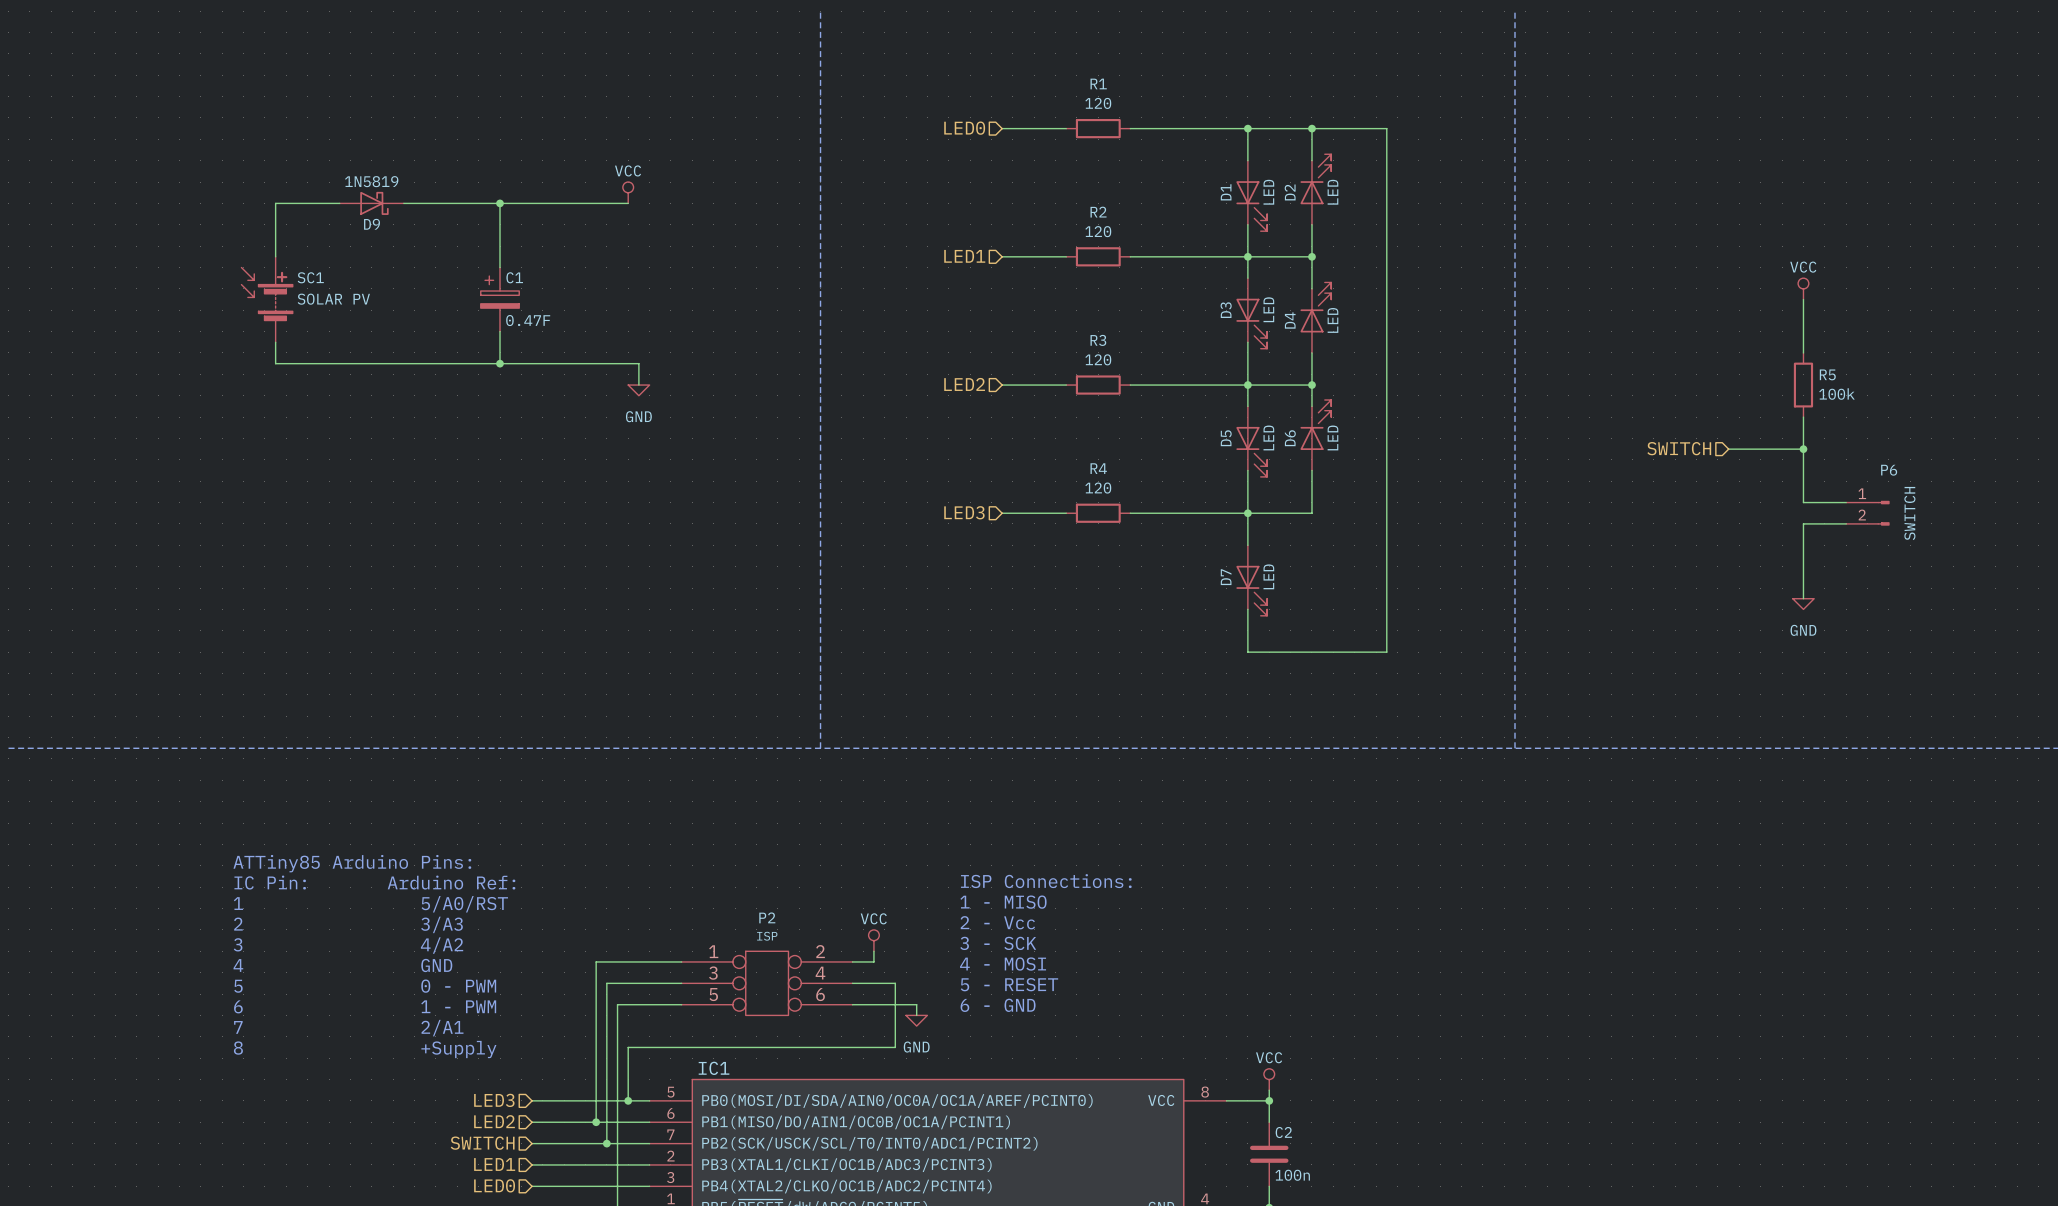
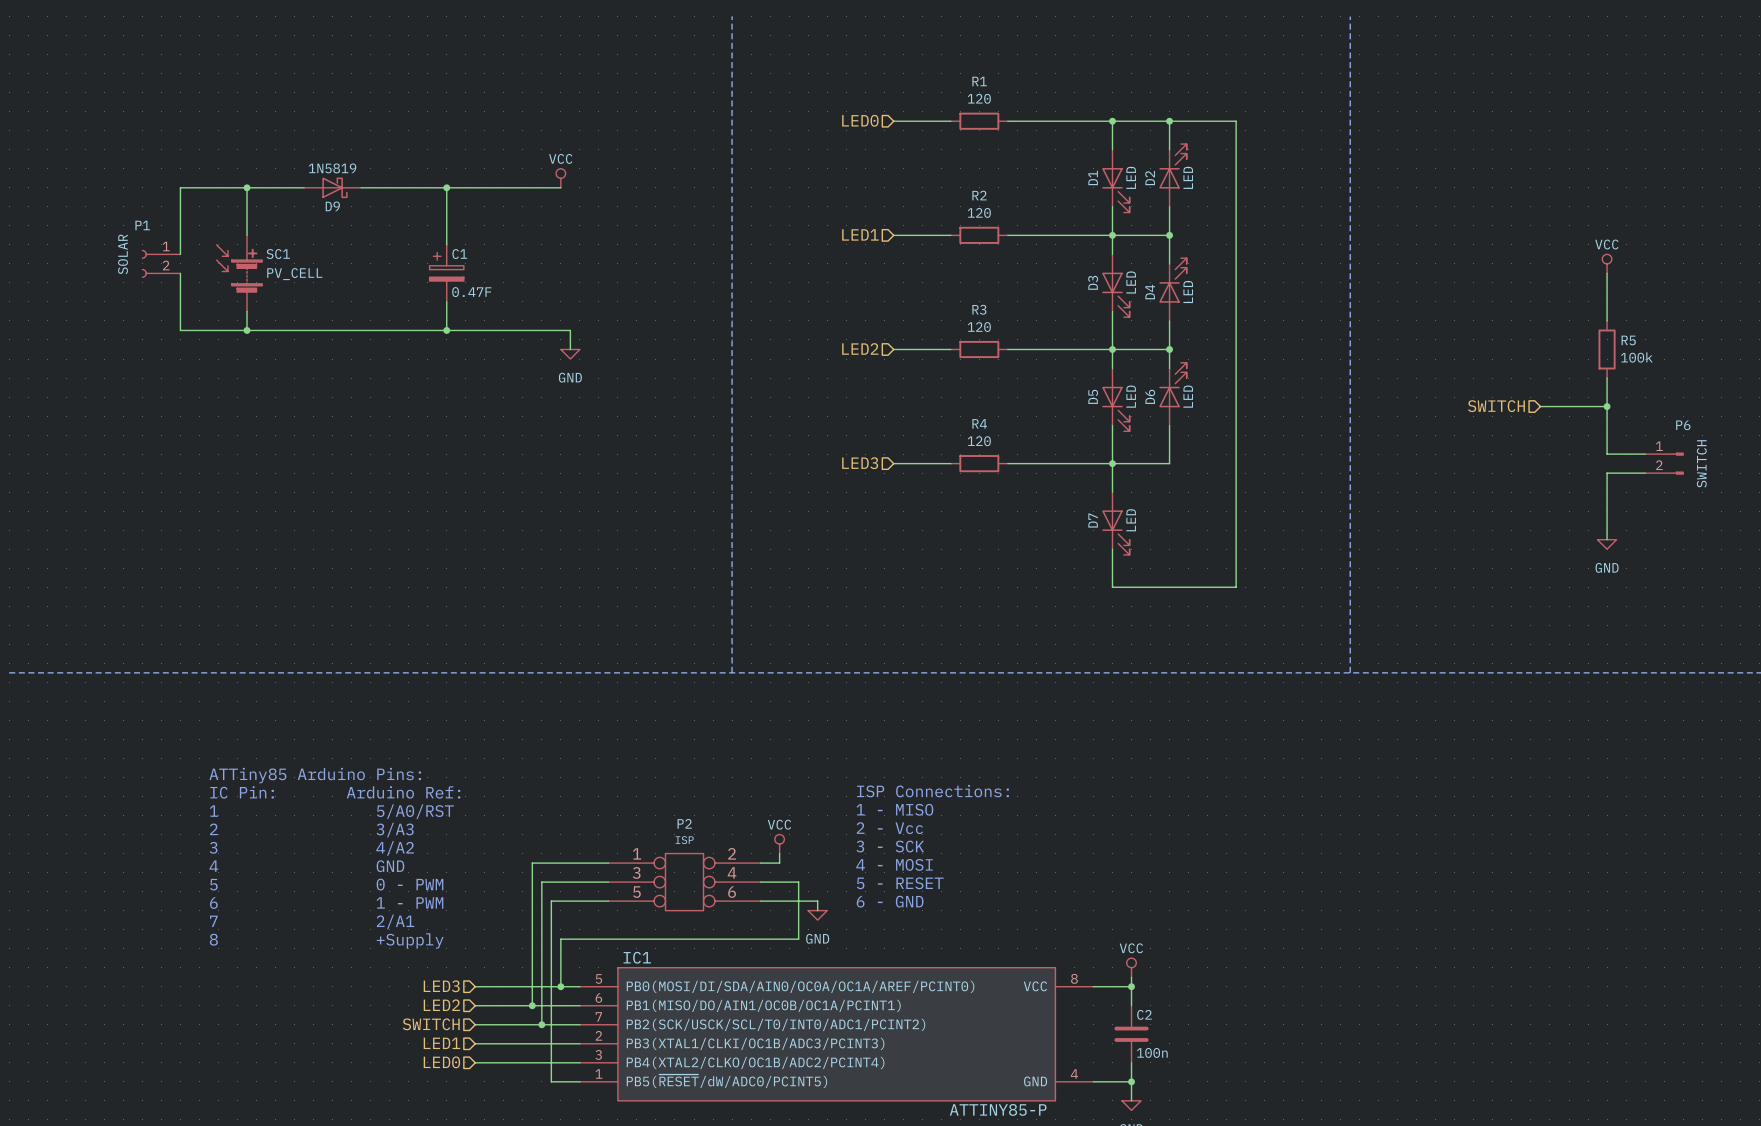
wire: none -> (247, 187) (180, 187) (180, 254)
junction: none -> (247, 187)
P1: none -> SOLAR (161, 263)
wire: none -> (180, 273) (180, 330) (247, 330)
SC1 value: SOLAR PV (333, 299) -> PV_CELL (294, 274)
junction: none -> (247, 330)

